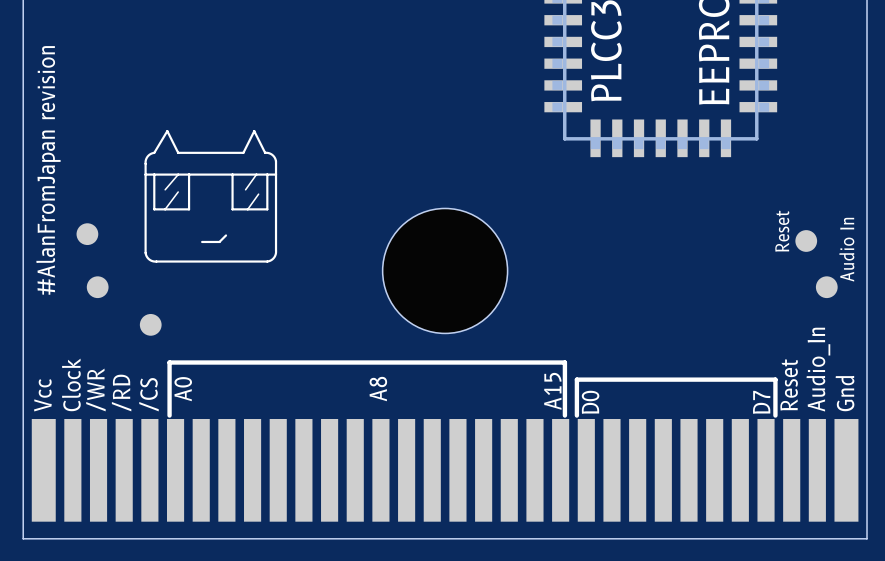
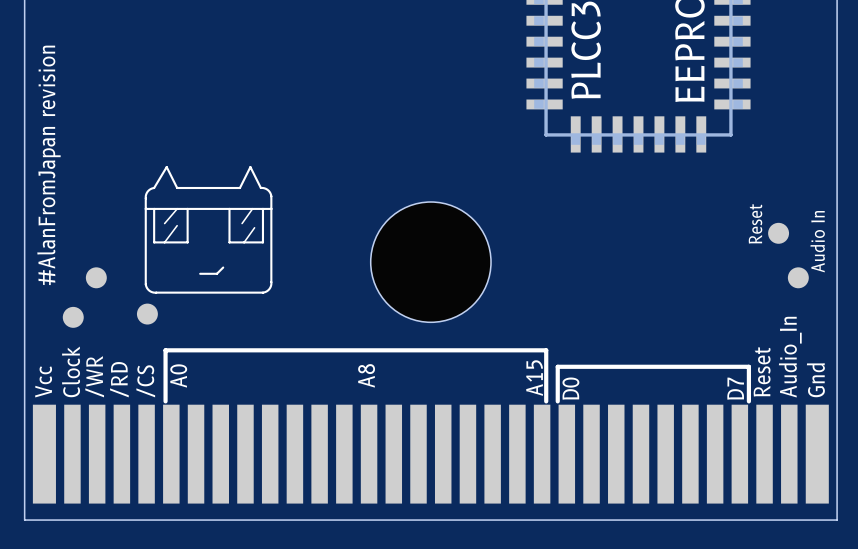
drawing position: (210, 196) -> (208, 229)
part position: (87, 234) -> (73, 317)

